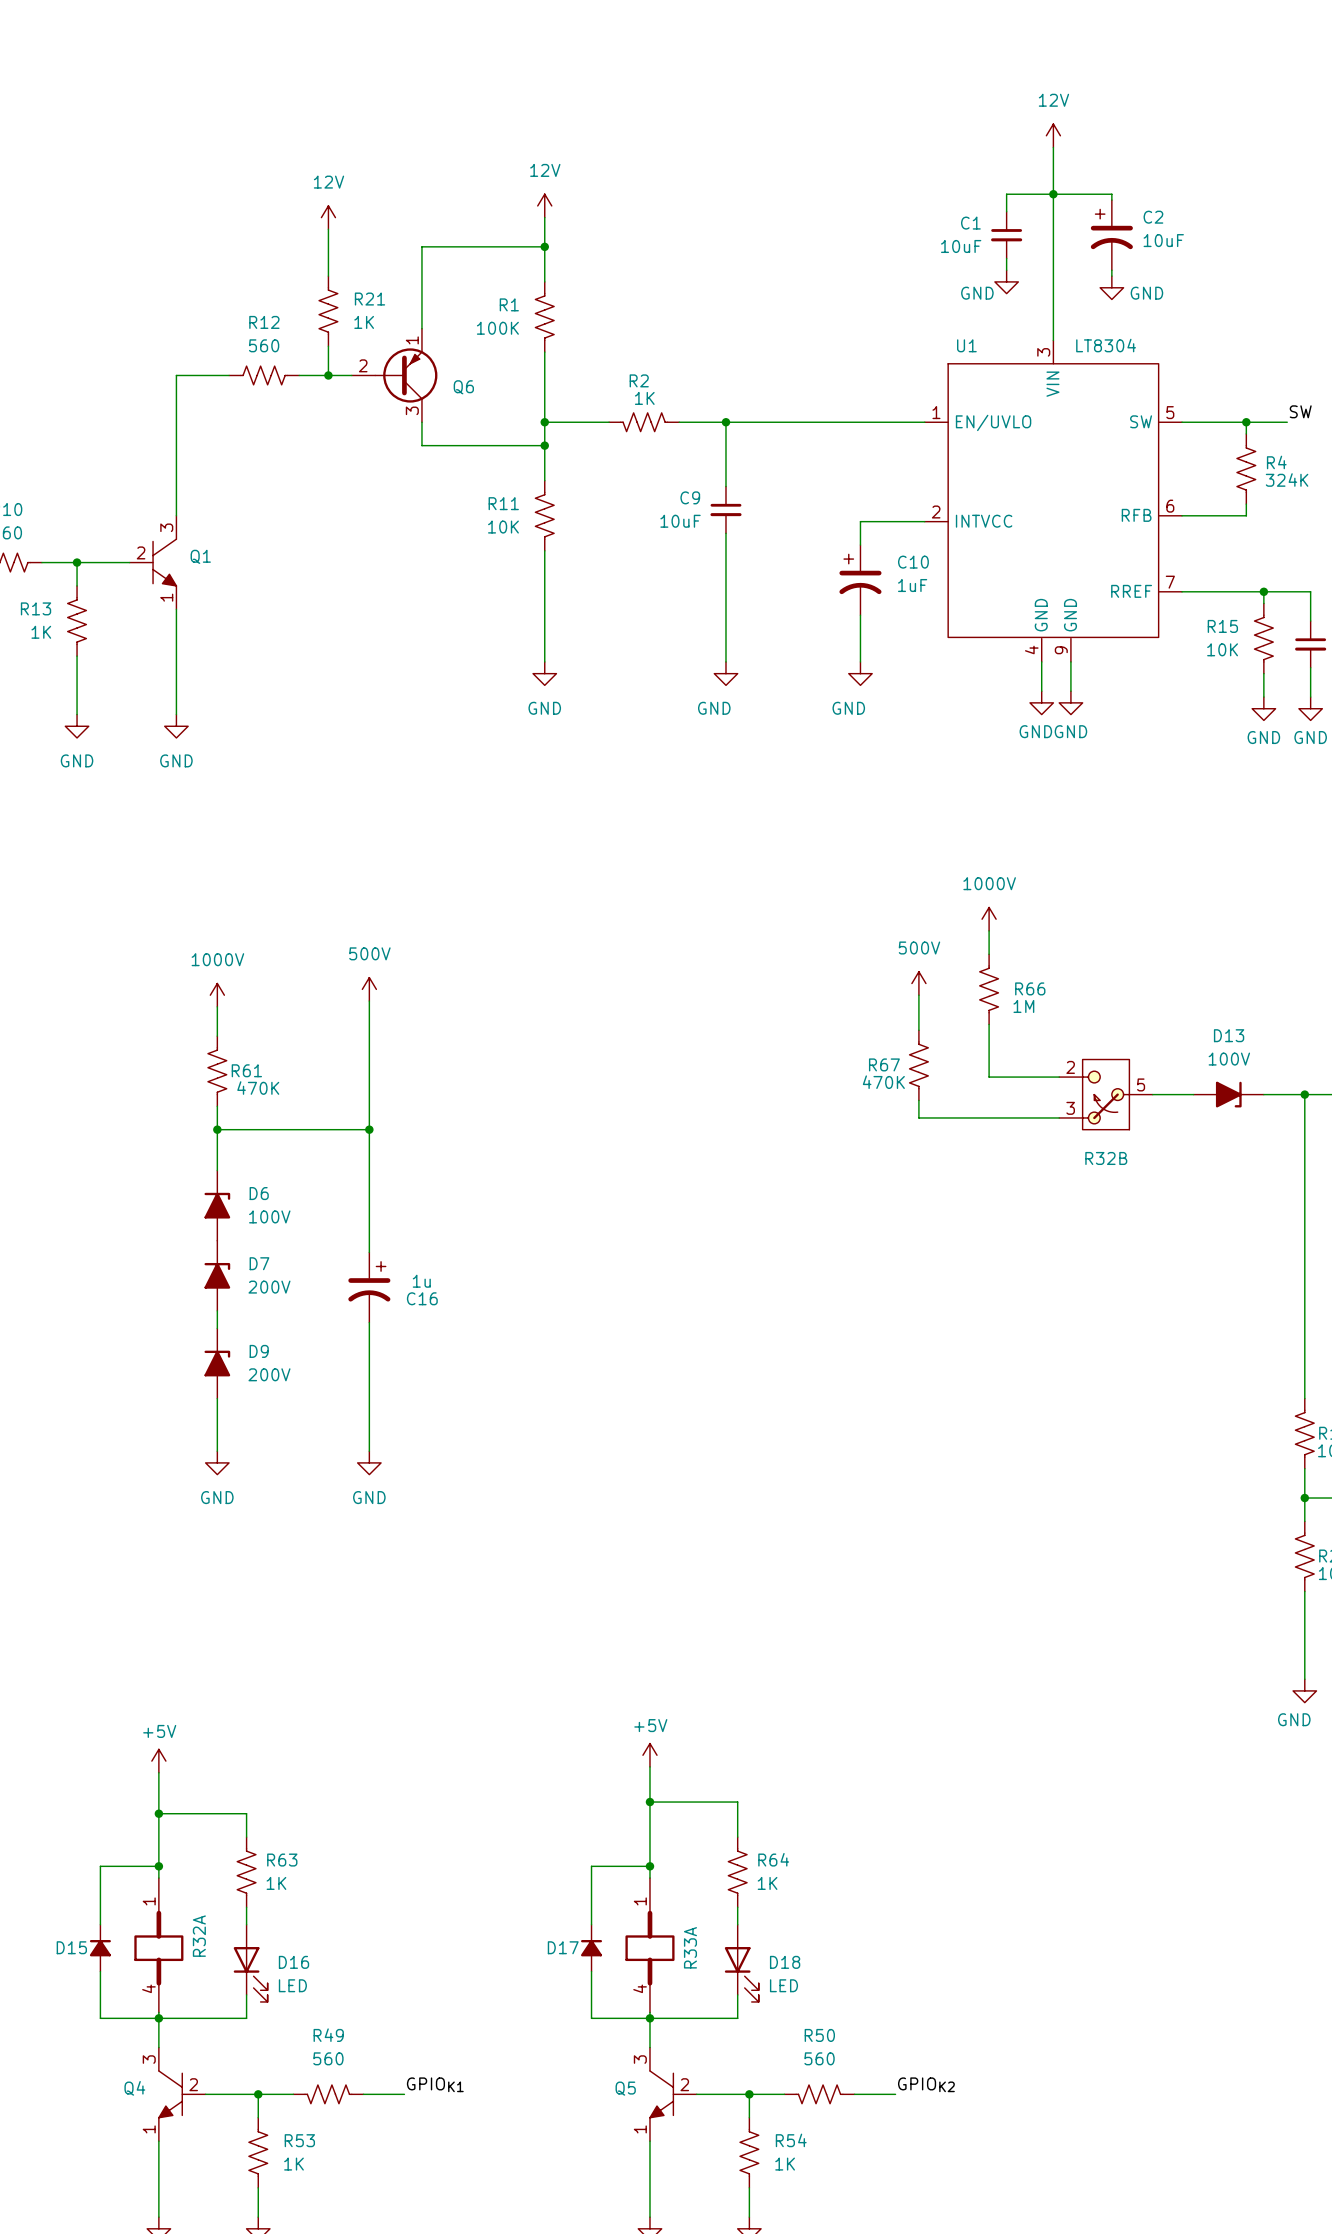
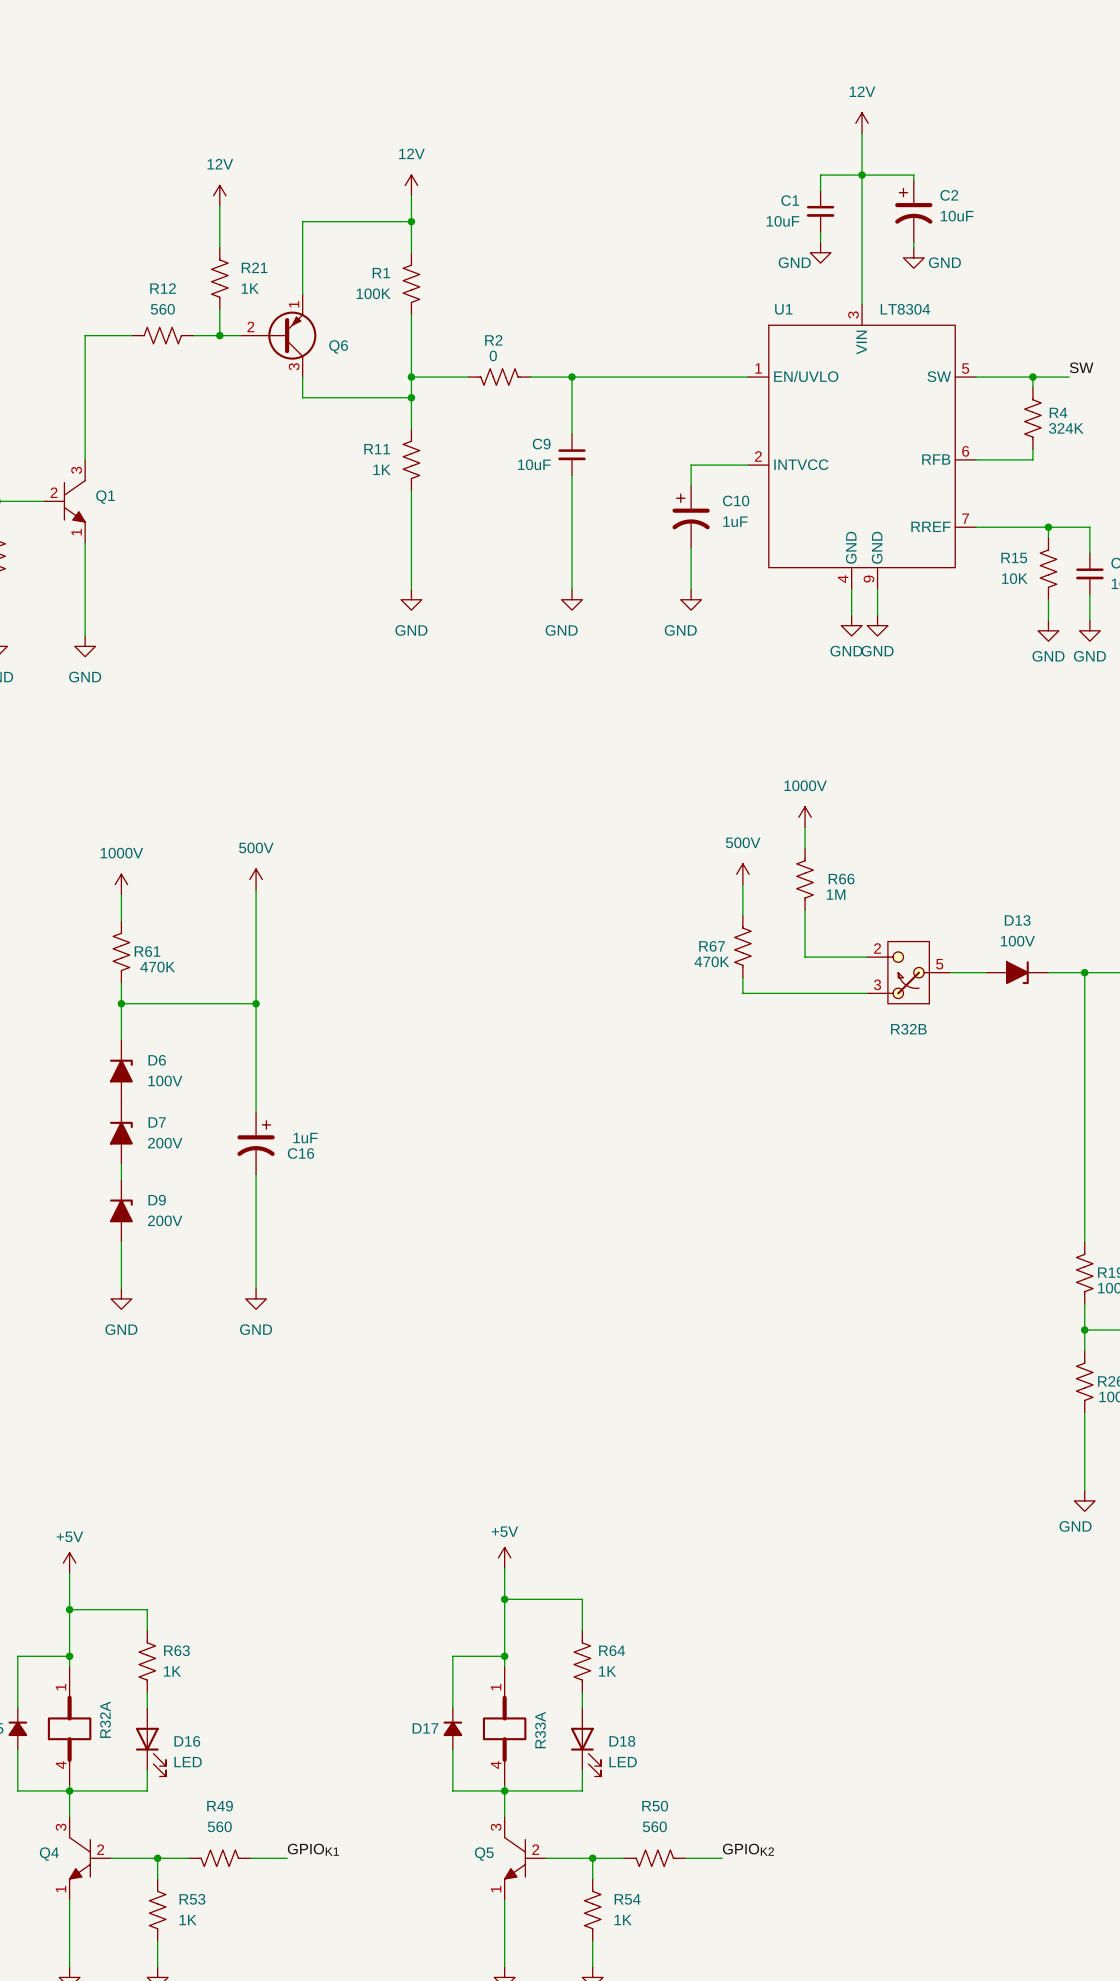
R2 value: 1K (644, 398) -> 0 (493, 355)
R11 value: 10K (503, 527) -> 1K (381, 469)
C16 value: 1u (421, 1281) -> 1uF (305, 1138)

